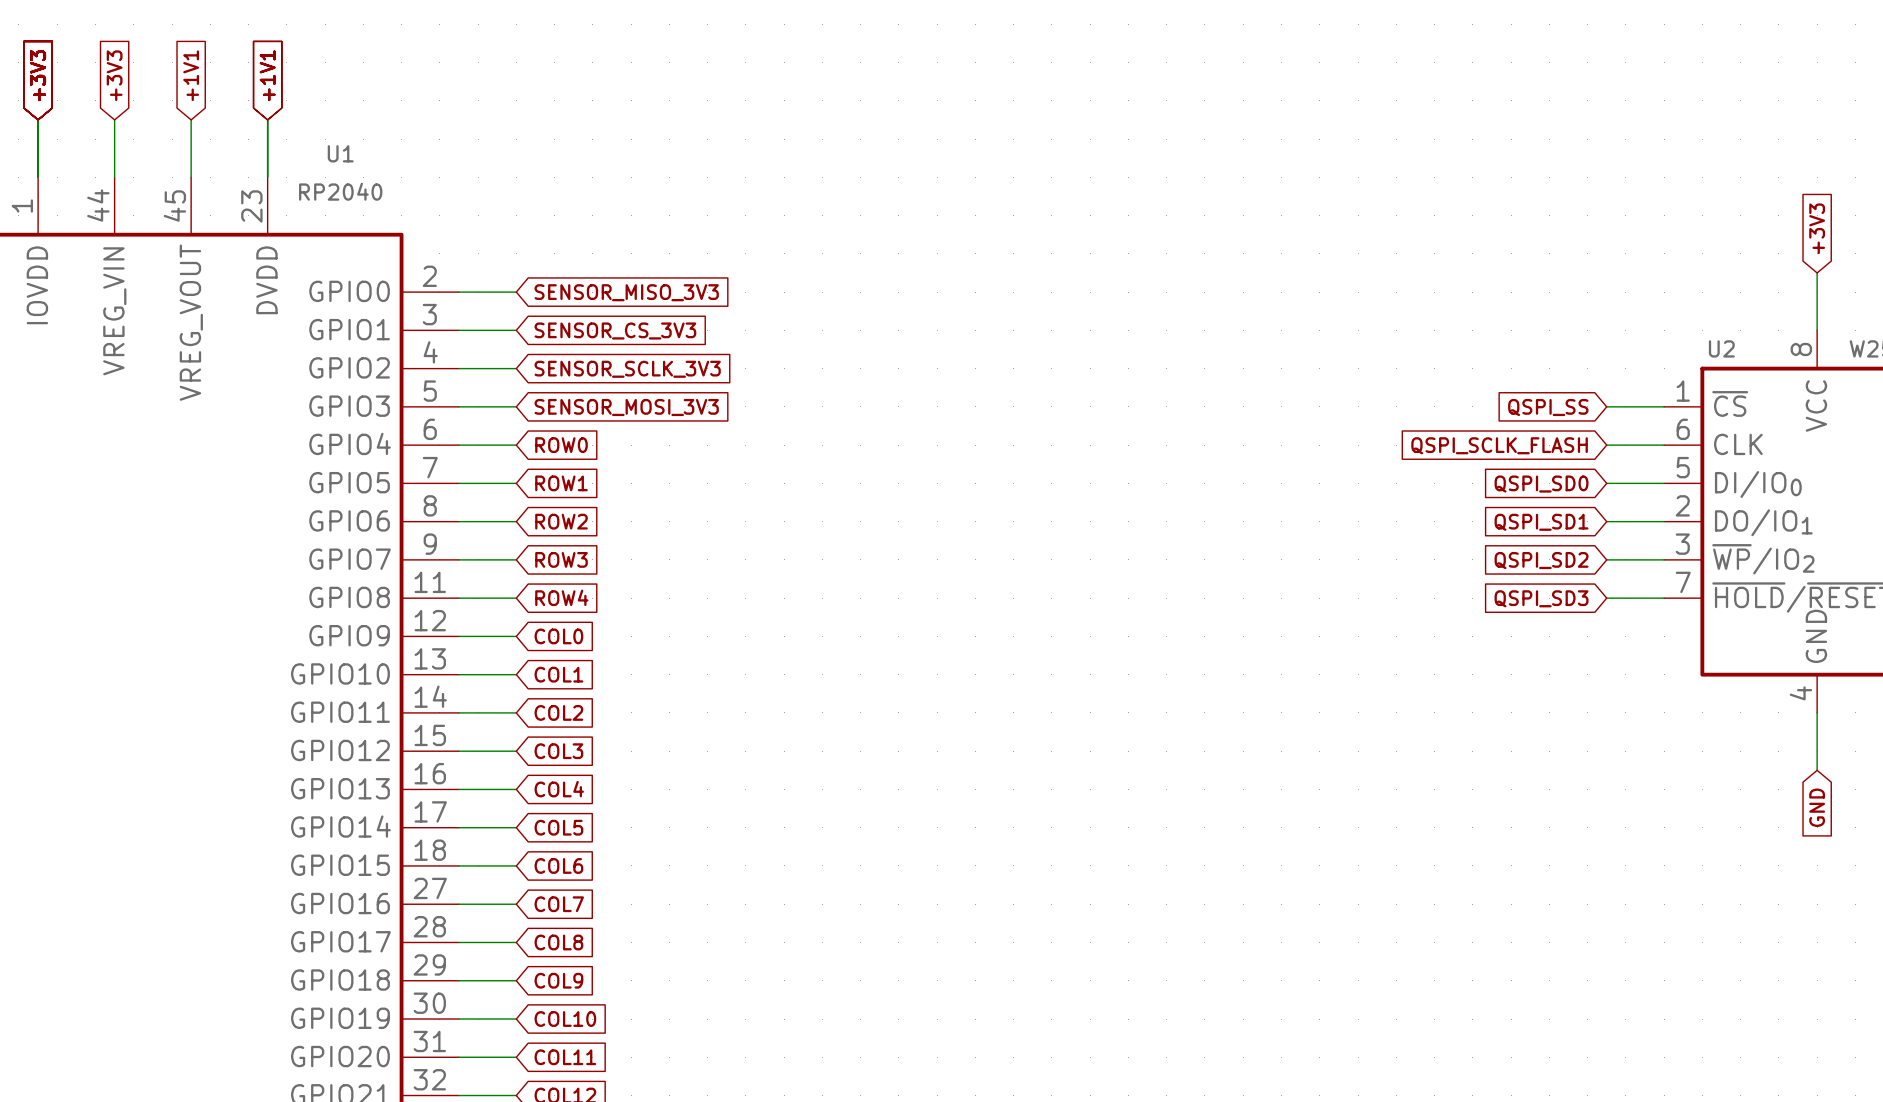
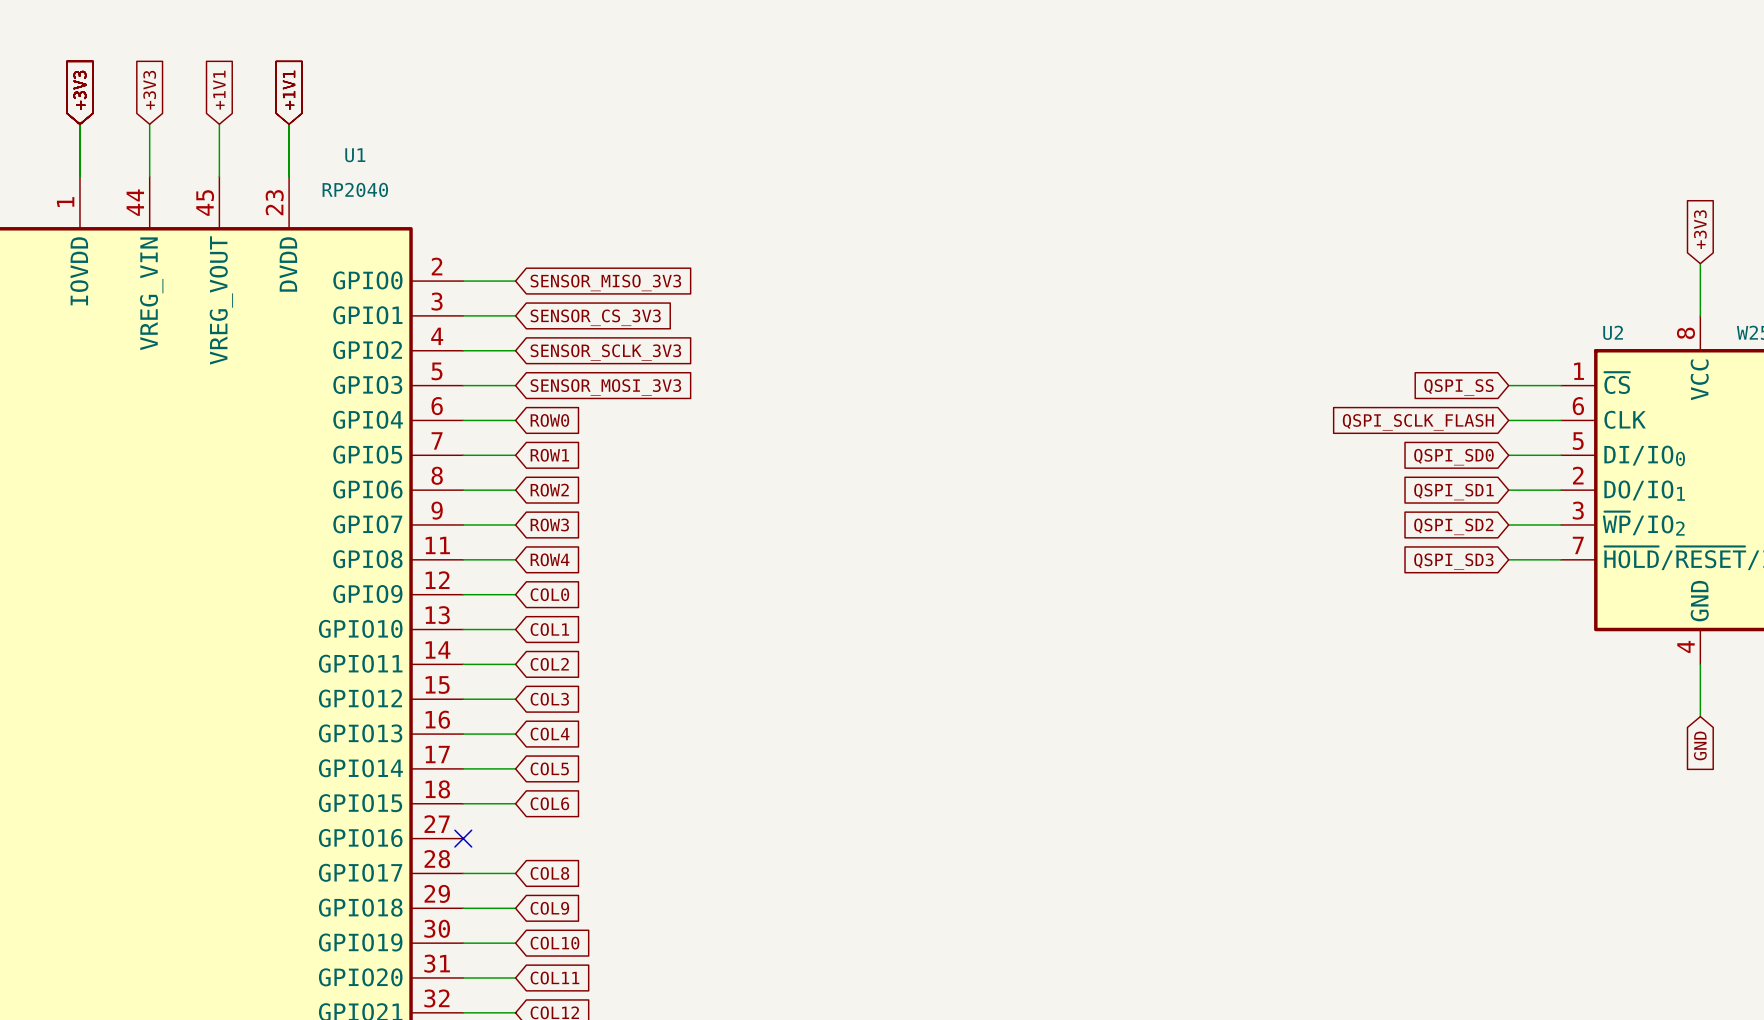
wire: (458, 904) (516, 904) -> none
no-connect mark: none -> (463, 838)
global label: COL7 (559, 904) -> none

